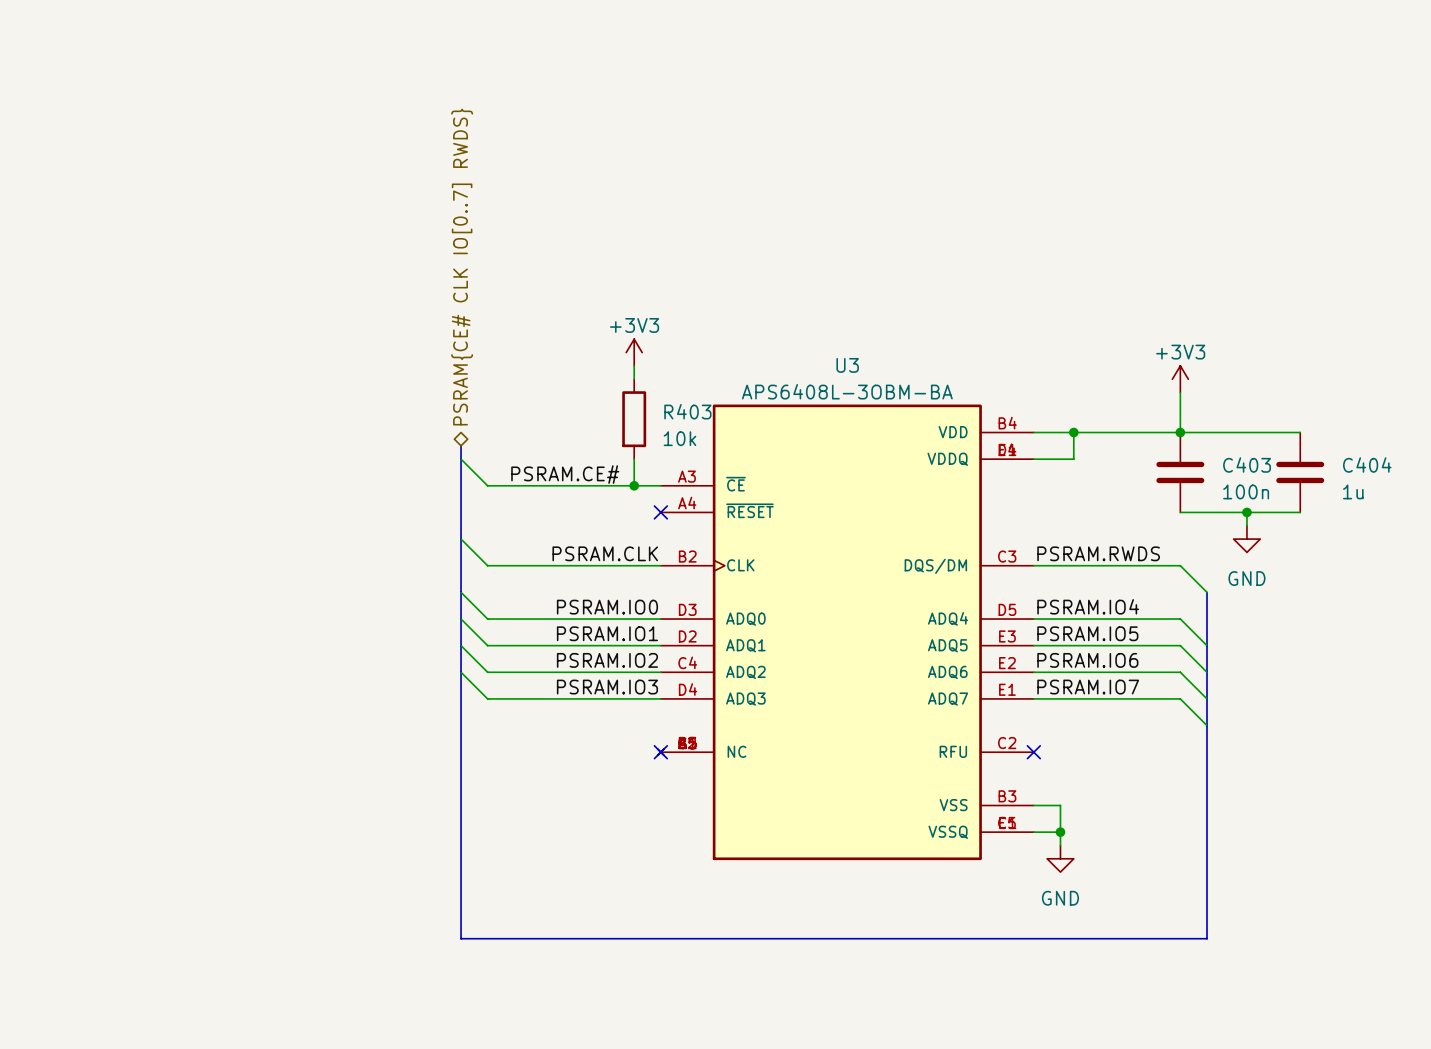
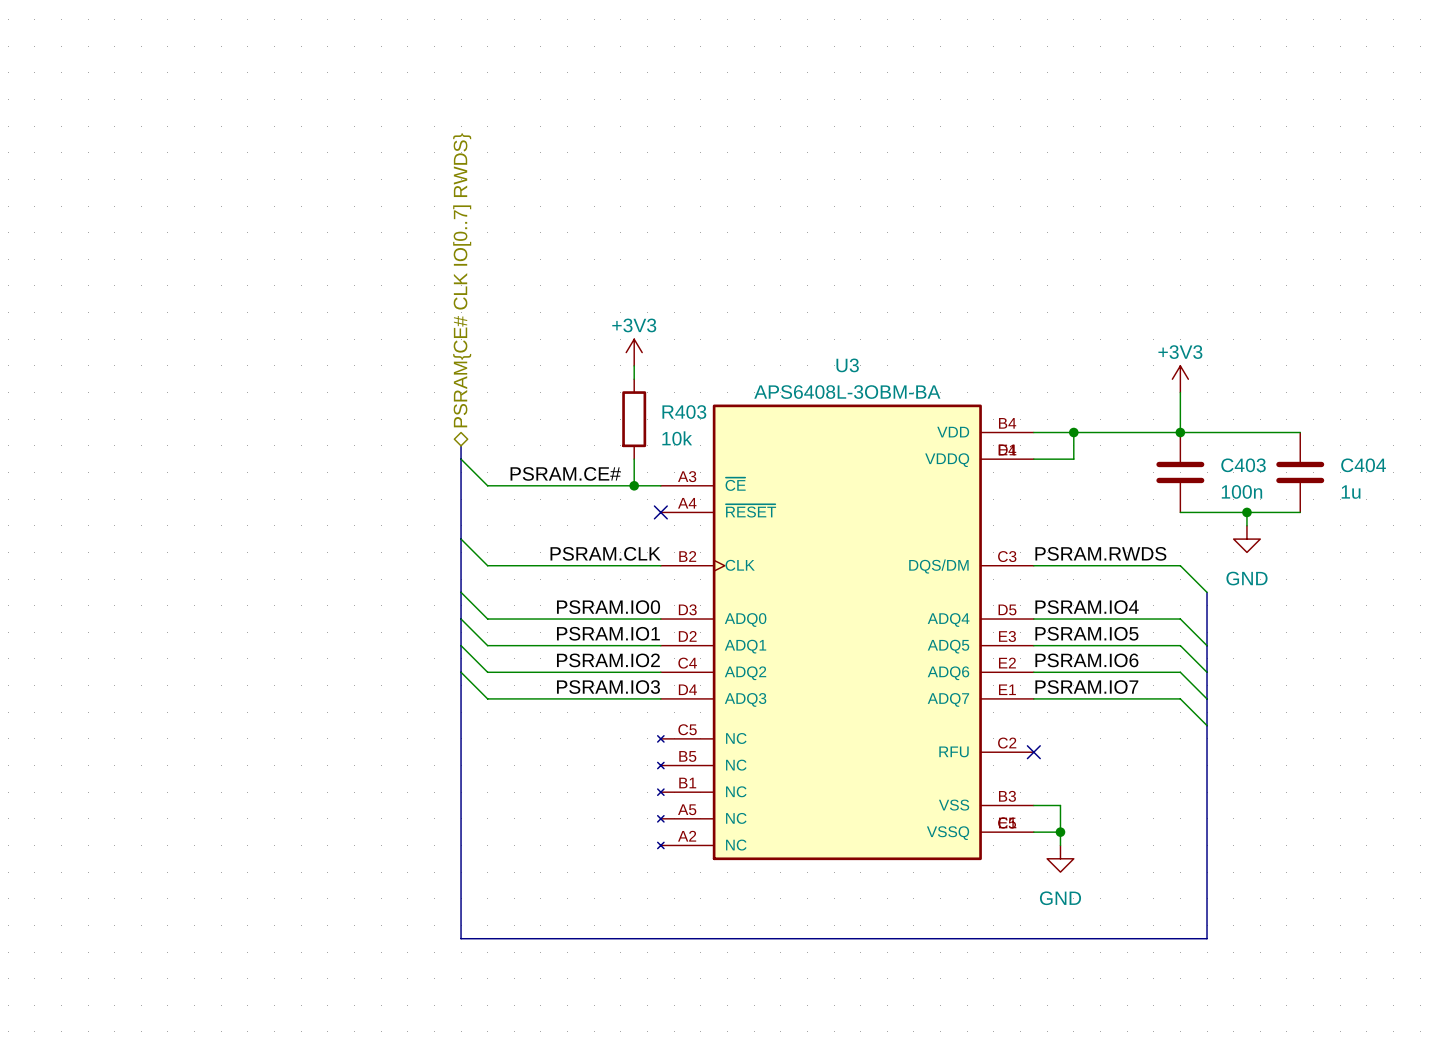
U3 symbol: [657, 404, 1034, 861] -> [657, 404, 1034, 861]
no-connect mark: (660, 752) -> none

